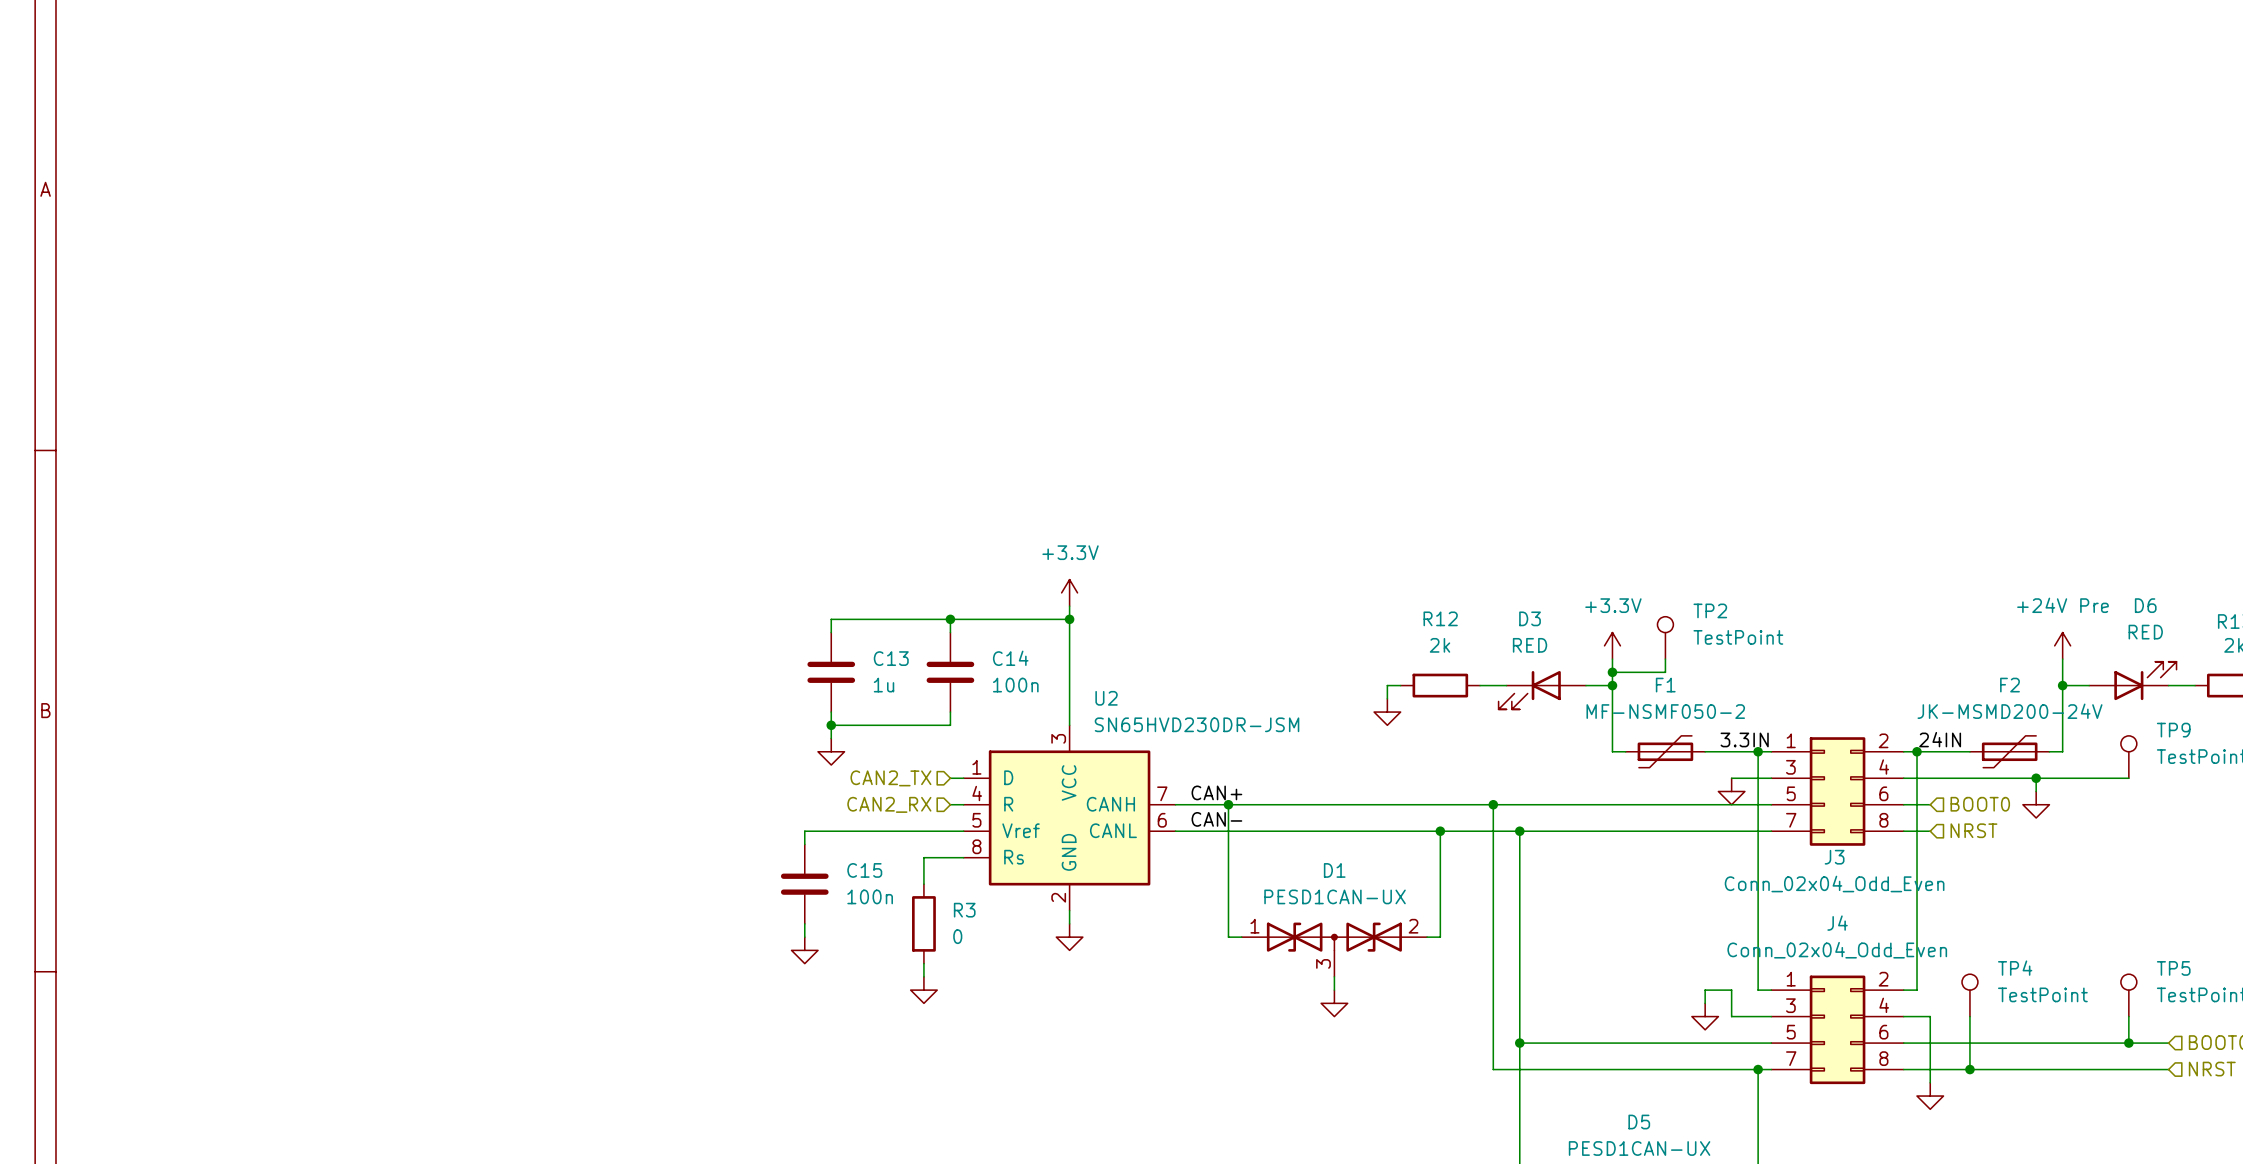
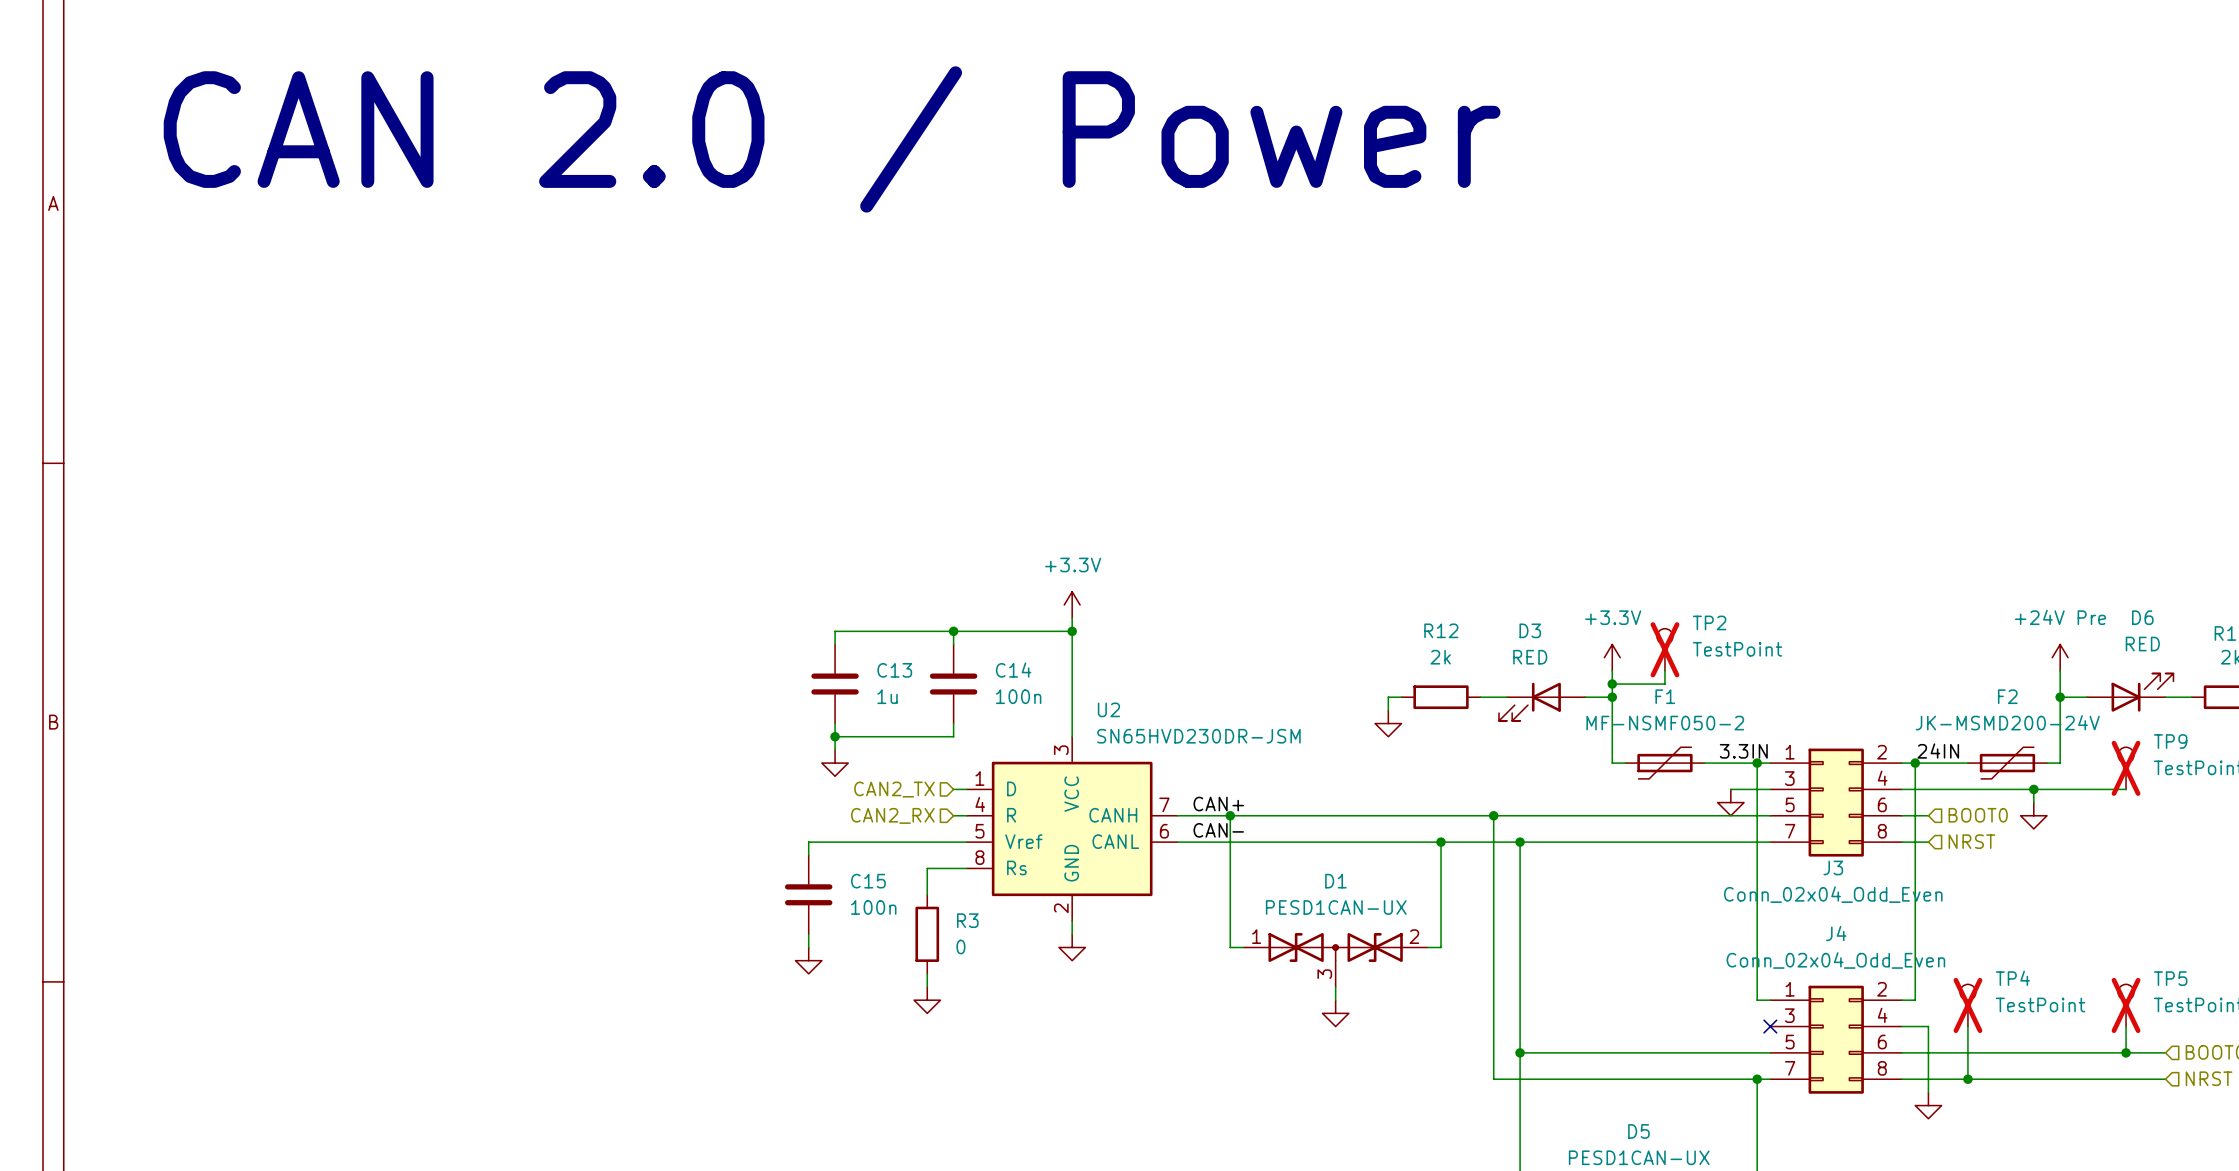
text: none -> CAN 2.0 / Power (832, 139)
TP2 do-not-place cross: none -> (1664, 649)
TP9 do-not-place cross: none -> (2126, 768)
TP4 do-not-place cross: none -> (1967, 1005)
TP5 do-not-place cross: none -> (2126, 1005)
wire: (1705, 1003) (1705, 990) (1731, 990) (1731, 1016) (1771, 1016) -> none
power symbol: (1705, 1016) -> none
no-connect mark: none -> (1770, 1026)

